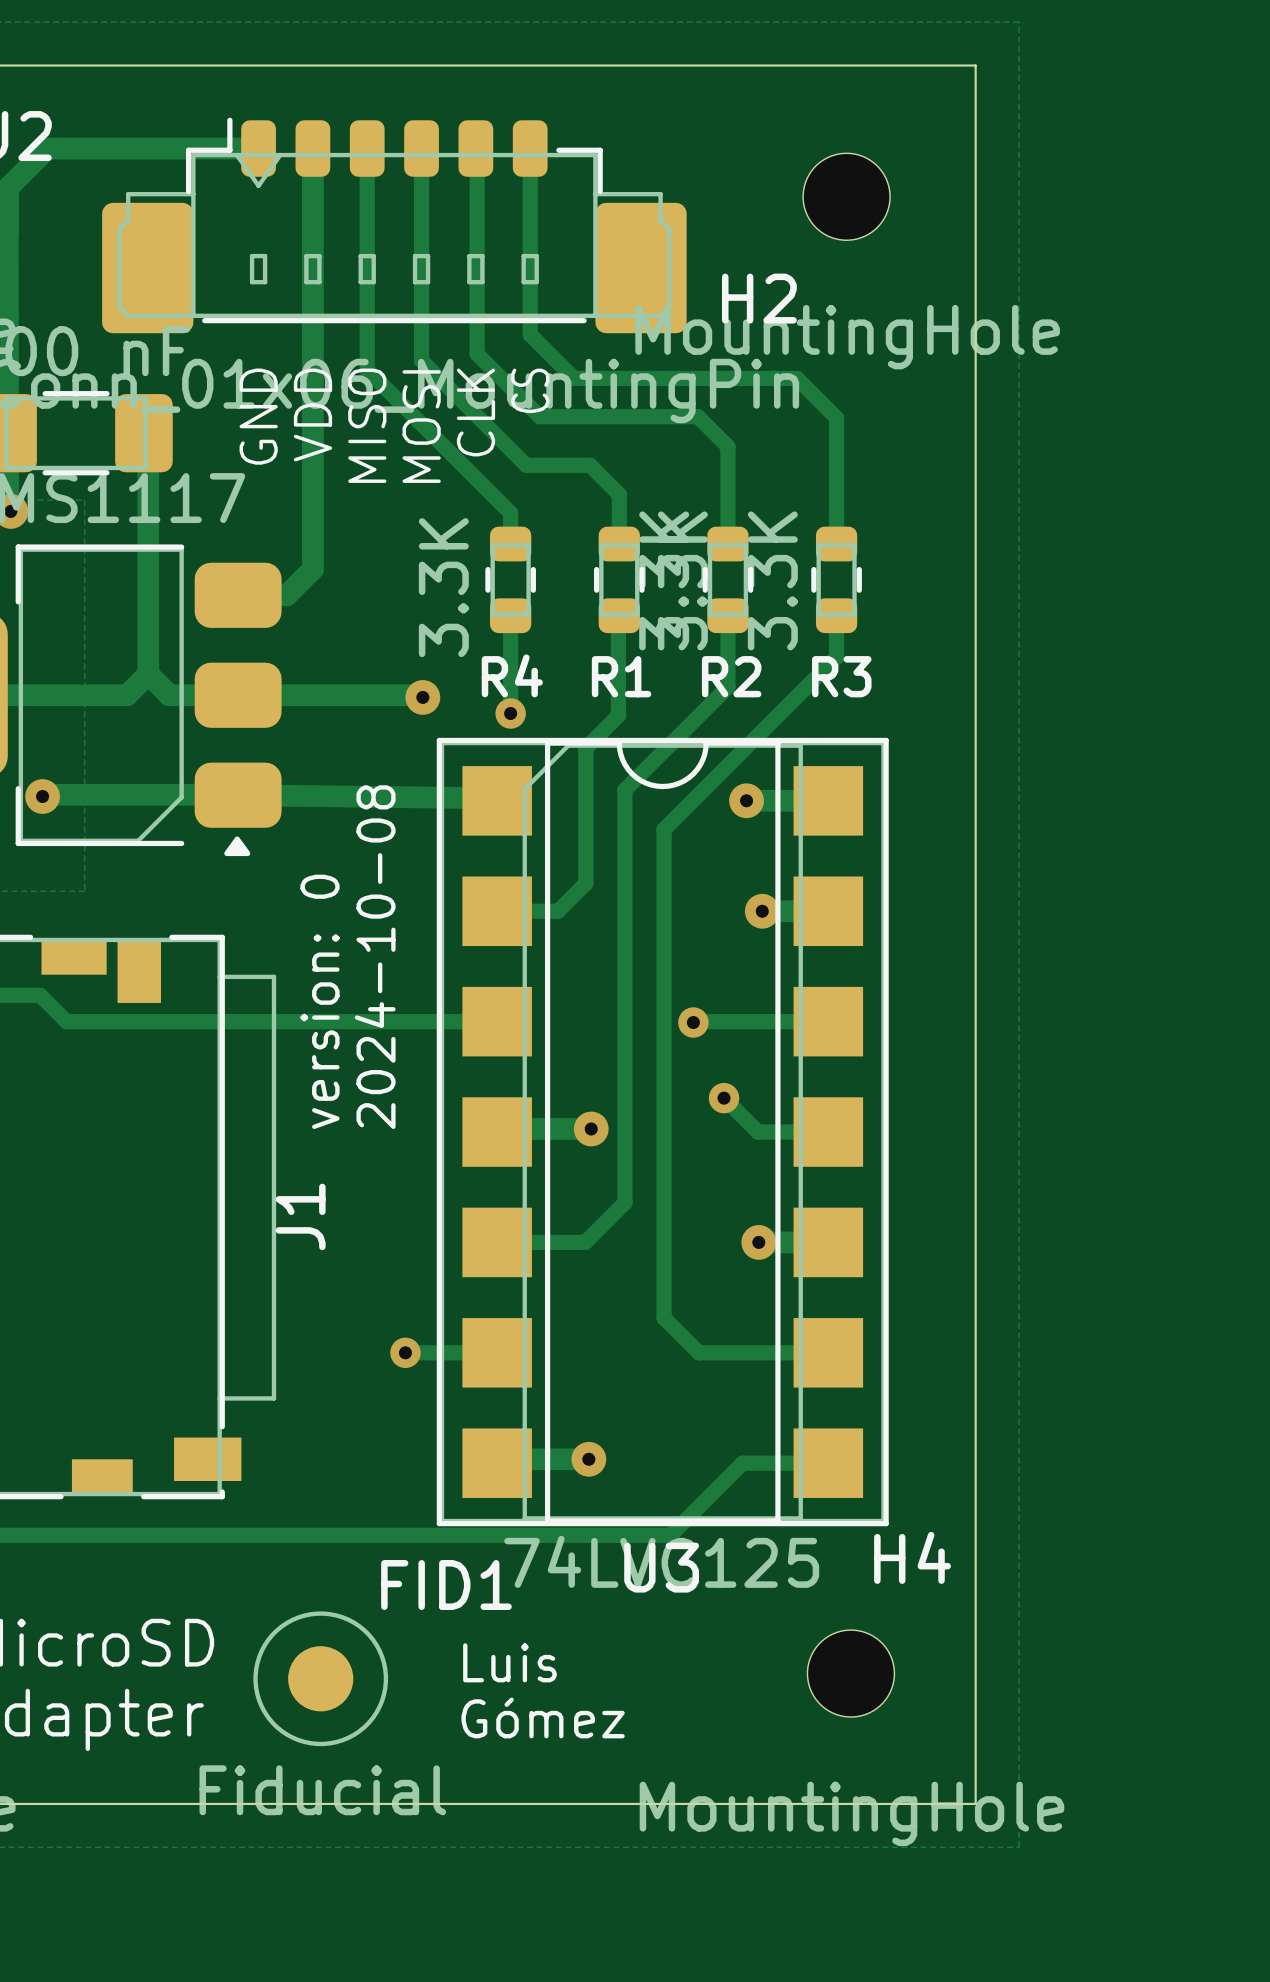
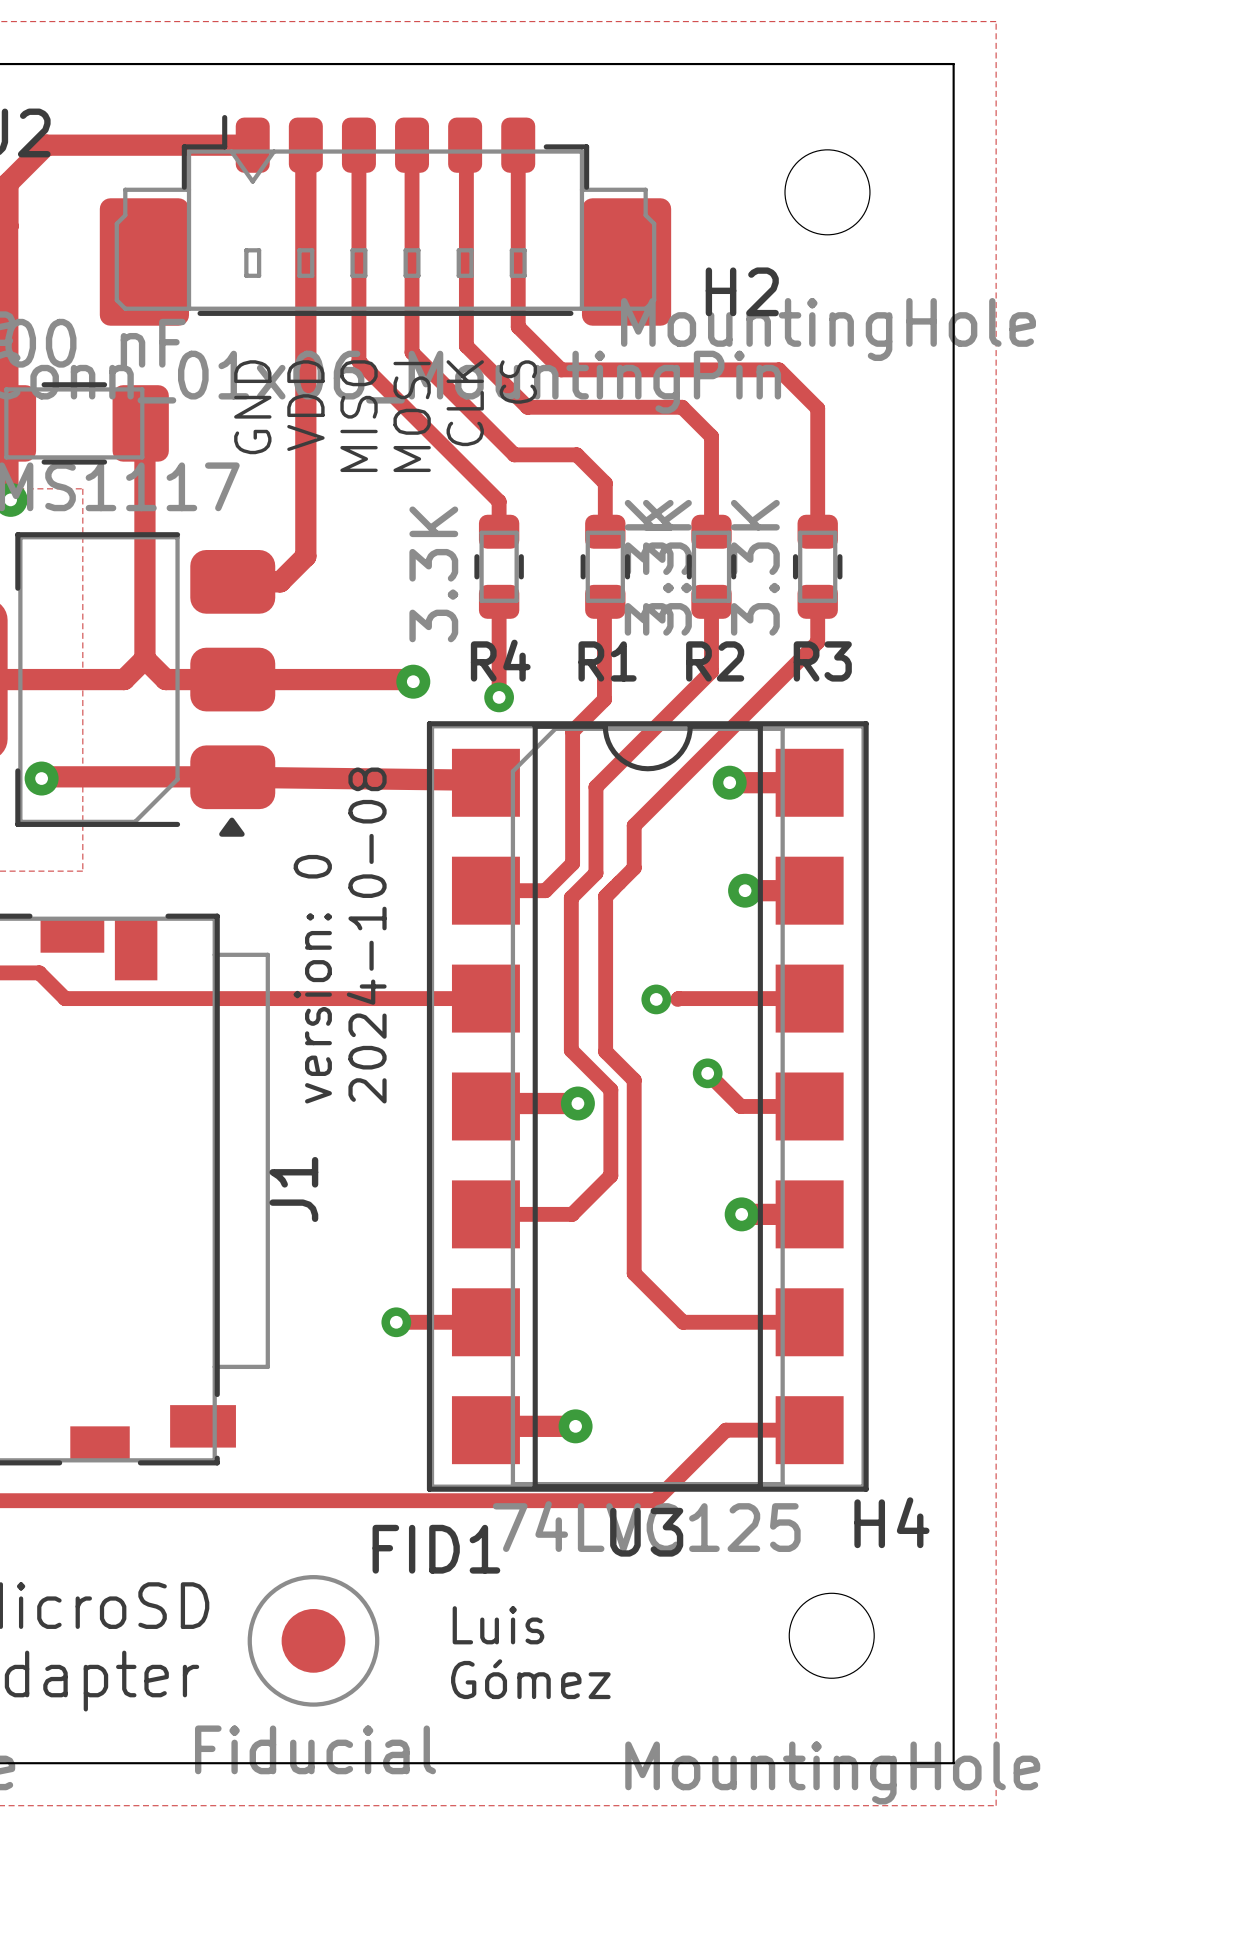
track: (624, 790) (624, 1115) -> (610, 772) (595, 787) (595, 873) (571, 897) (571, 1050) (610, 1089)
track: (664, 829) (664, 1318) -> (649, 810) (634, 825) (634, 867) (605, 896) (605, 1051) (634, 1080) (634, 1273) (649, 1288)
via position: (693, 1022) -> (656, 999)

